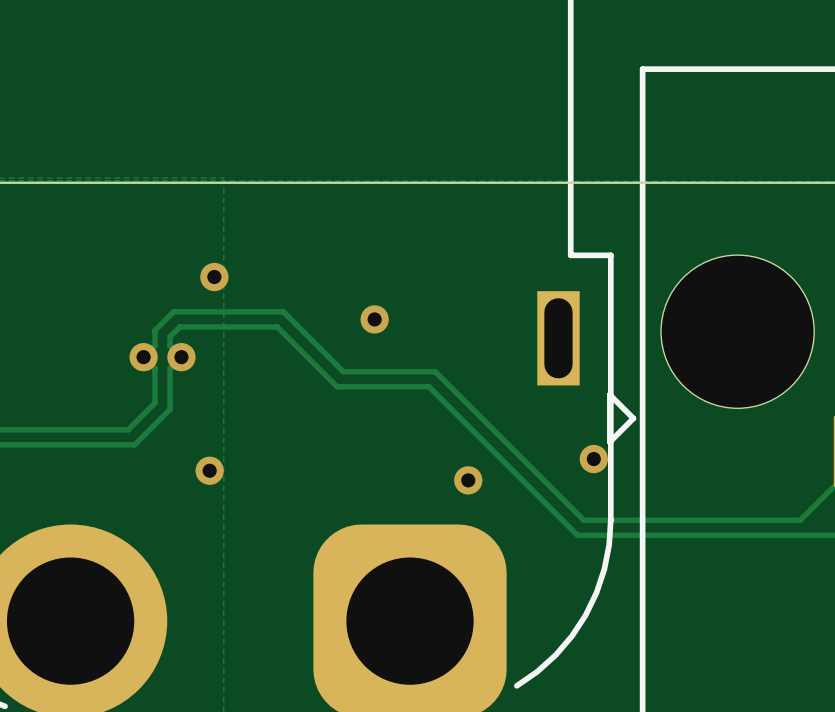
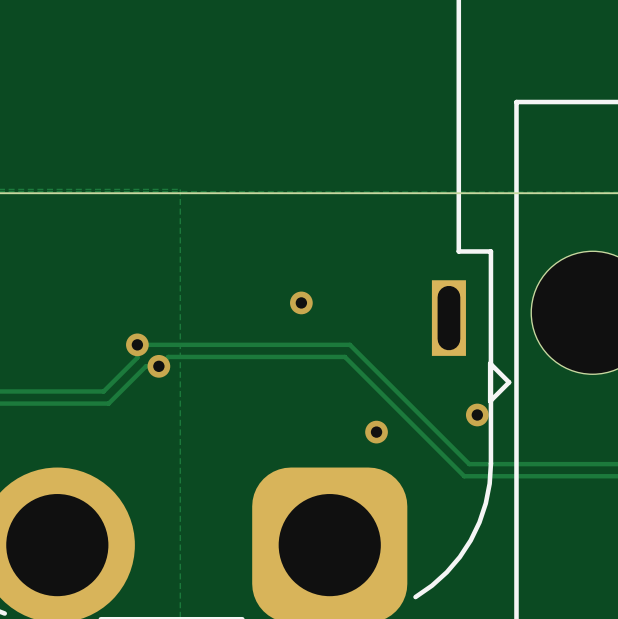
via: (214, 277) -> none
via: (143, 357) -> none
via: (181, 357) -> none
via: none -> (137, 344)
track: (343, 371) (283, 311) (173, 311) (154, 330) (154, 345) (143, 357) (154, 368) (154, 403) -> (276, 344) (137, 344) (137, 357) (125, 370)
track: (337, 386) (277, 326) (179, 326) (170, 336) (170, 345) (181, 357) (170, 368) (170, 409) -> (271, 356) (168, 356) (158, 366) (145, 366) (137, 375)
via: none -> (158, 366)
via: (209, 470) -> none

